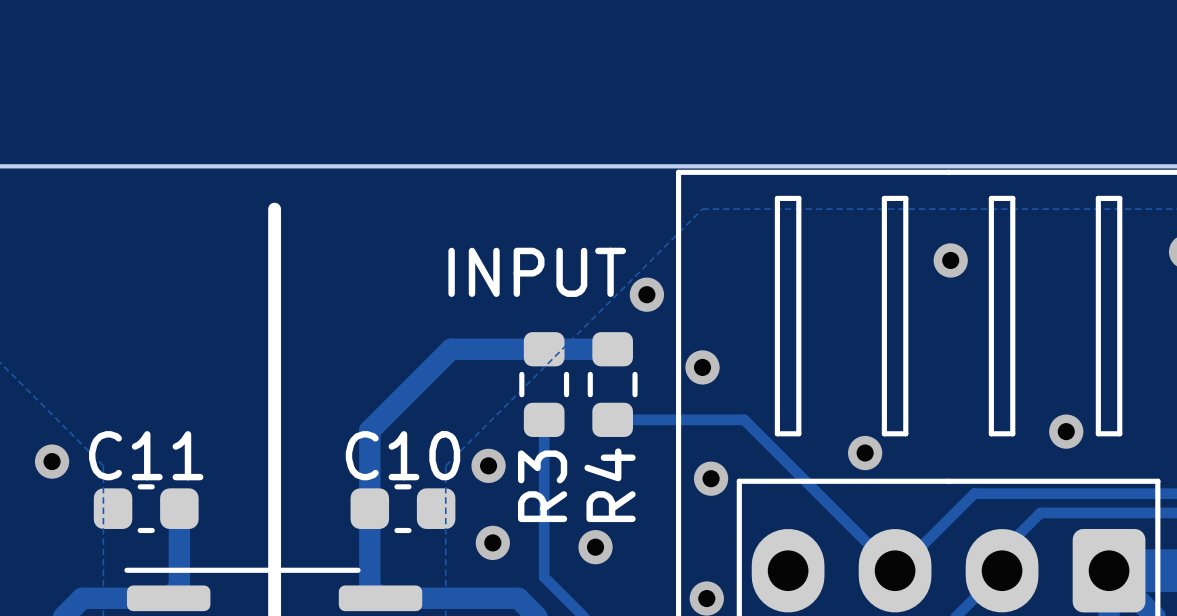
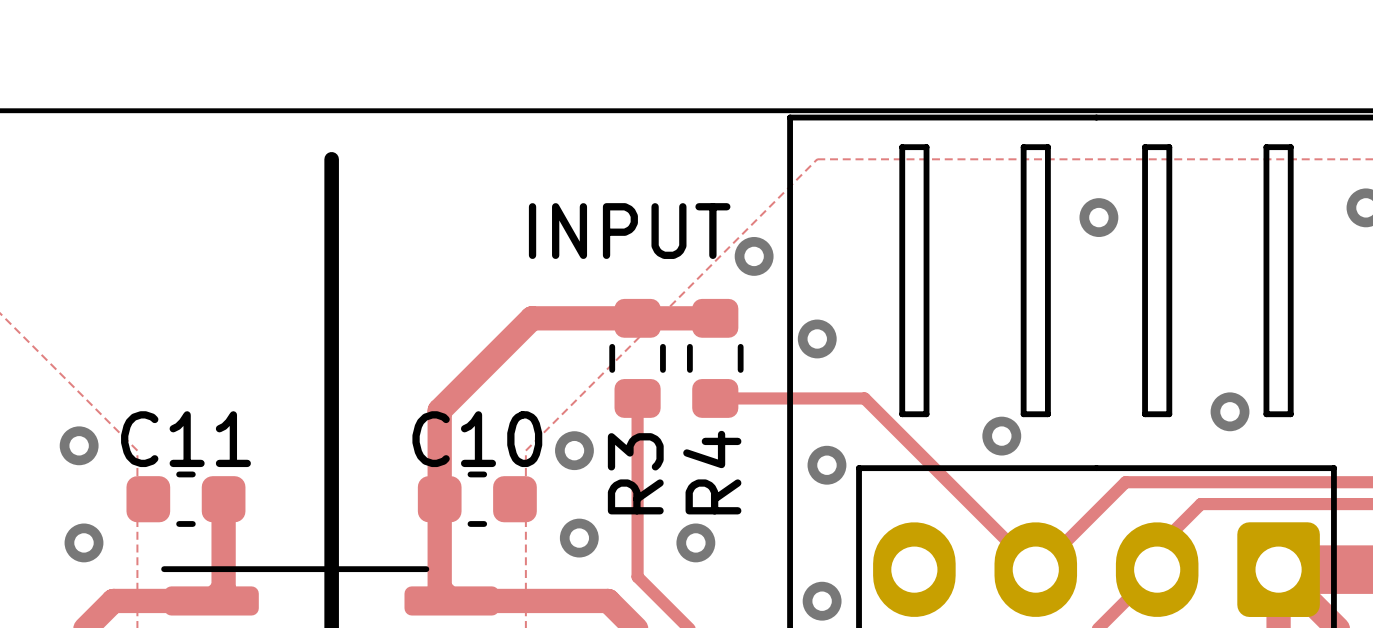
via: none -> (83, 542)

